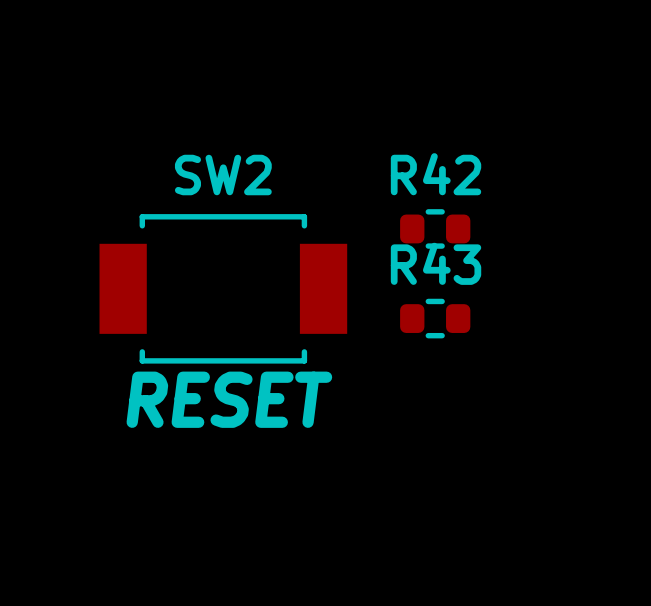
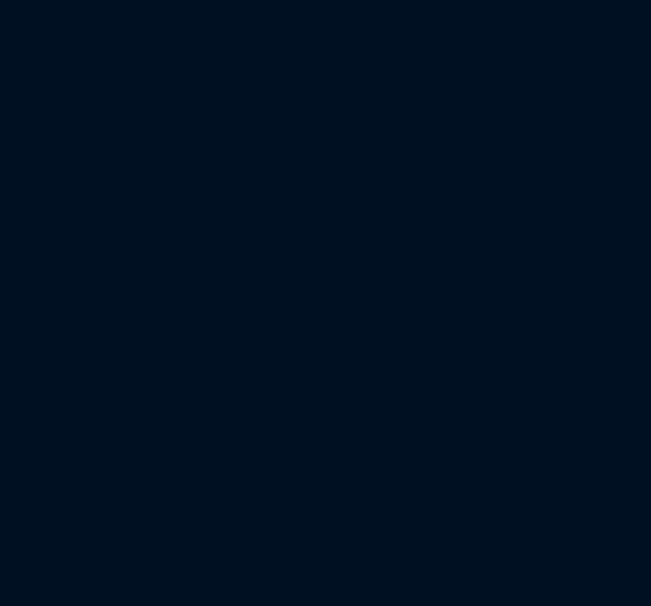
R42: (435, 228) -> none
SW2: RESET (223, 288) -> none
R43: (435, 318) -> none

